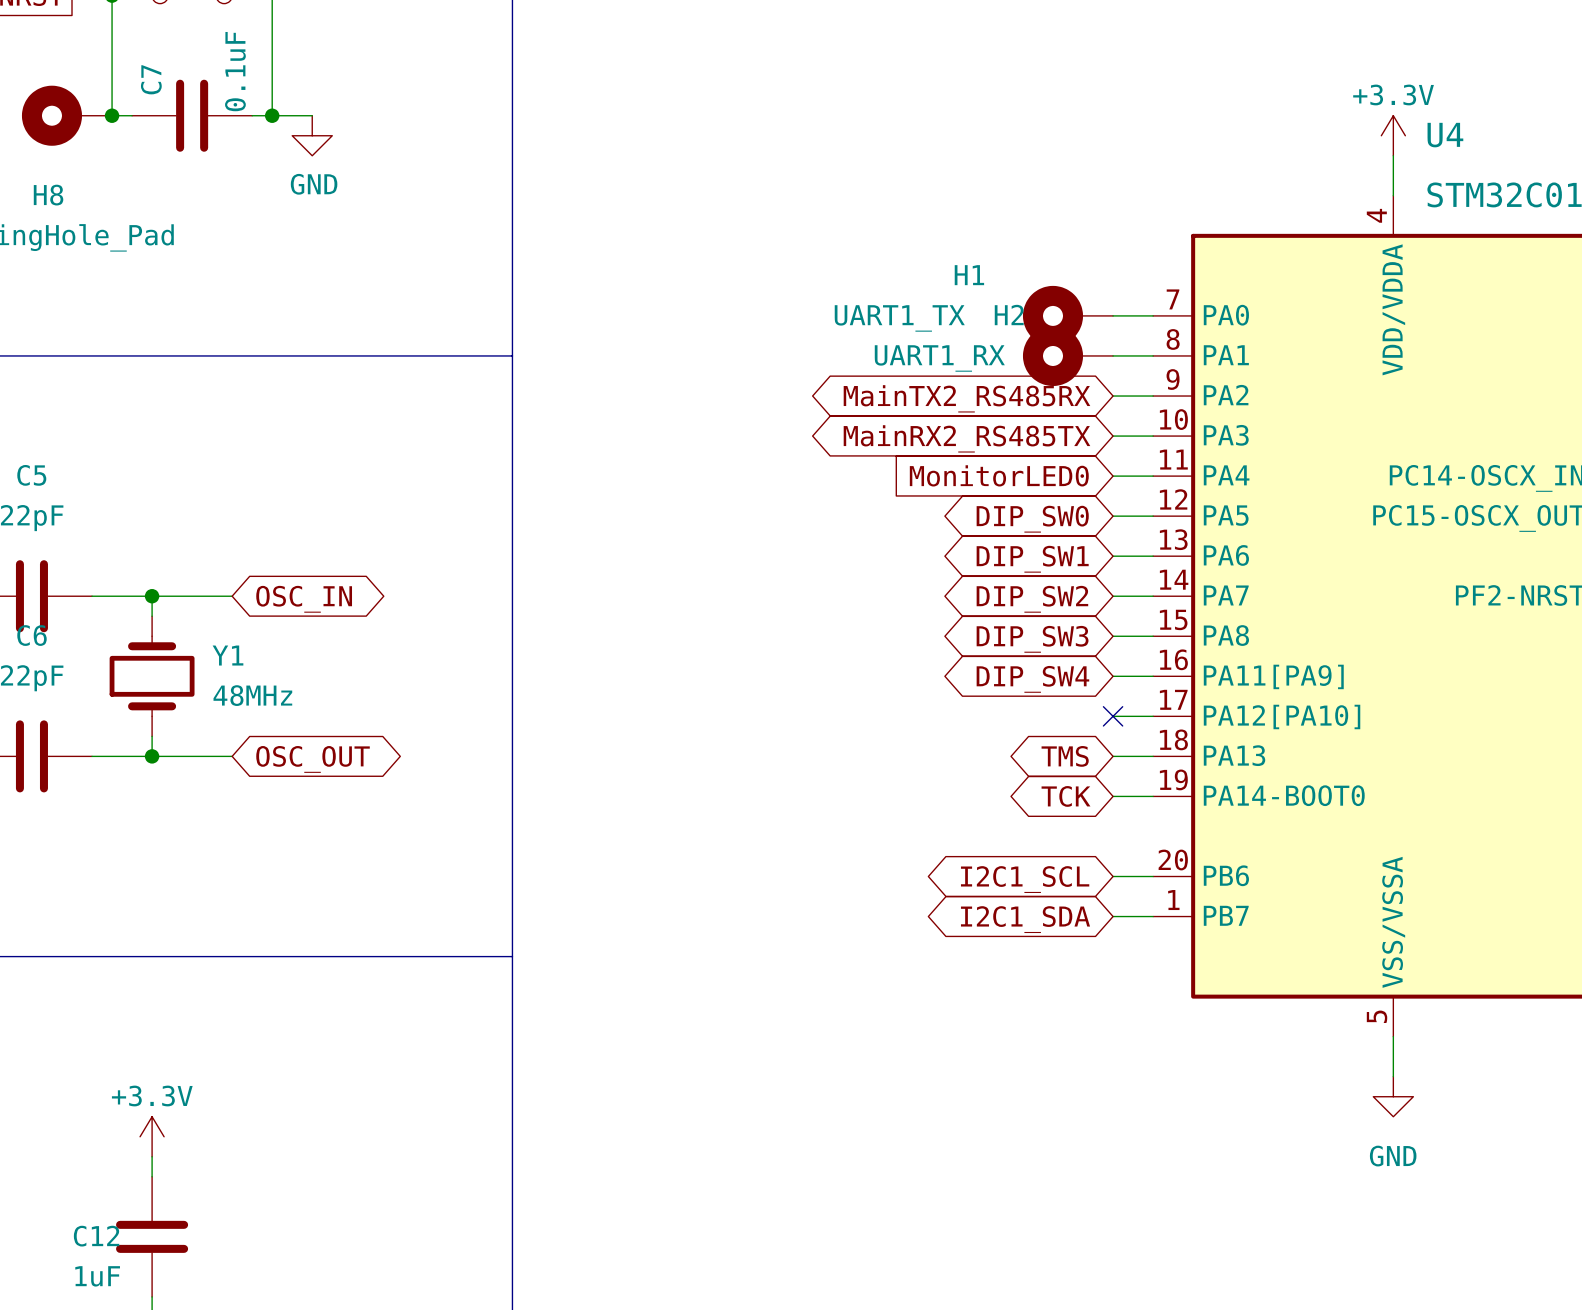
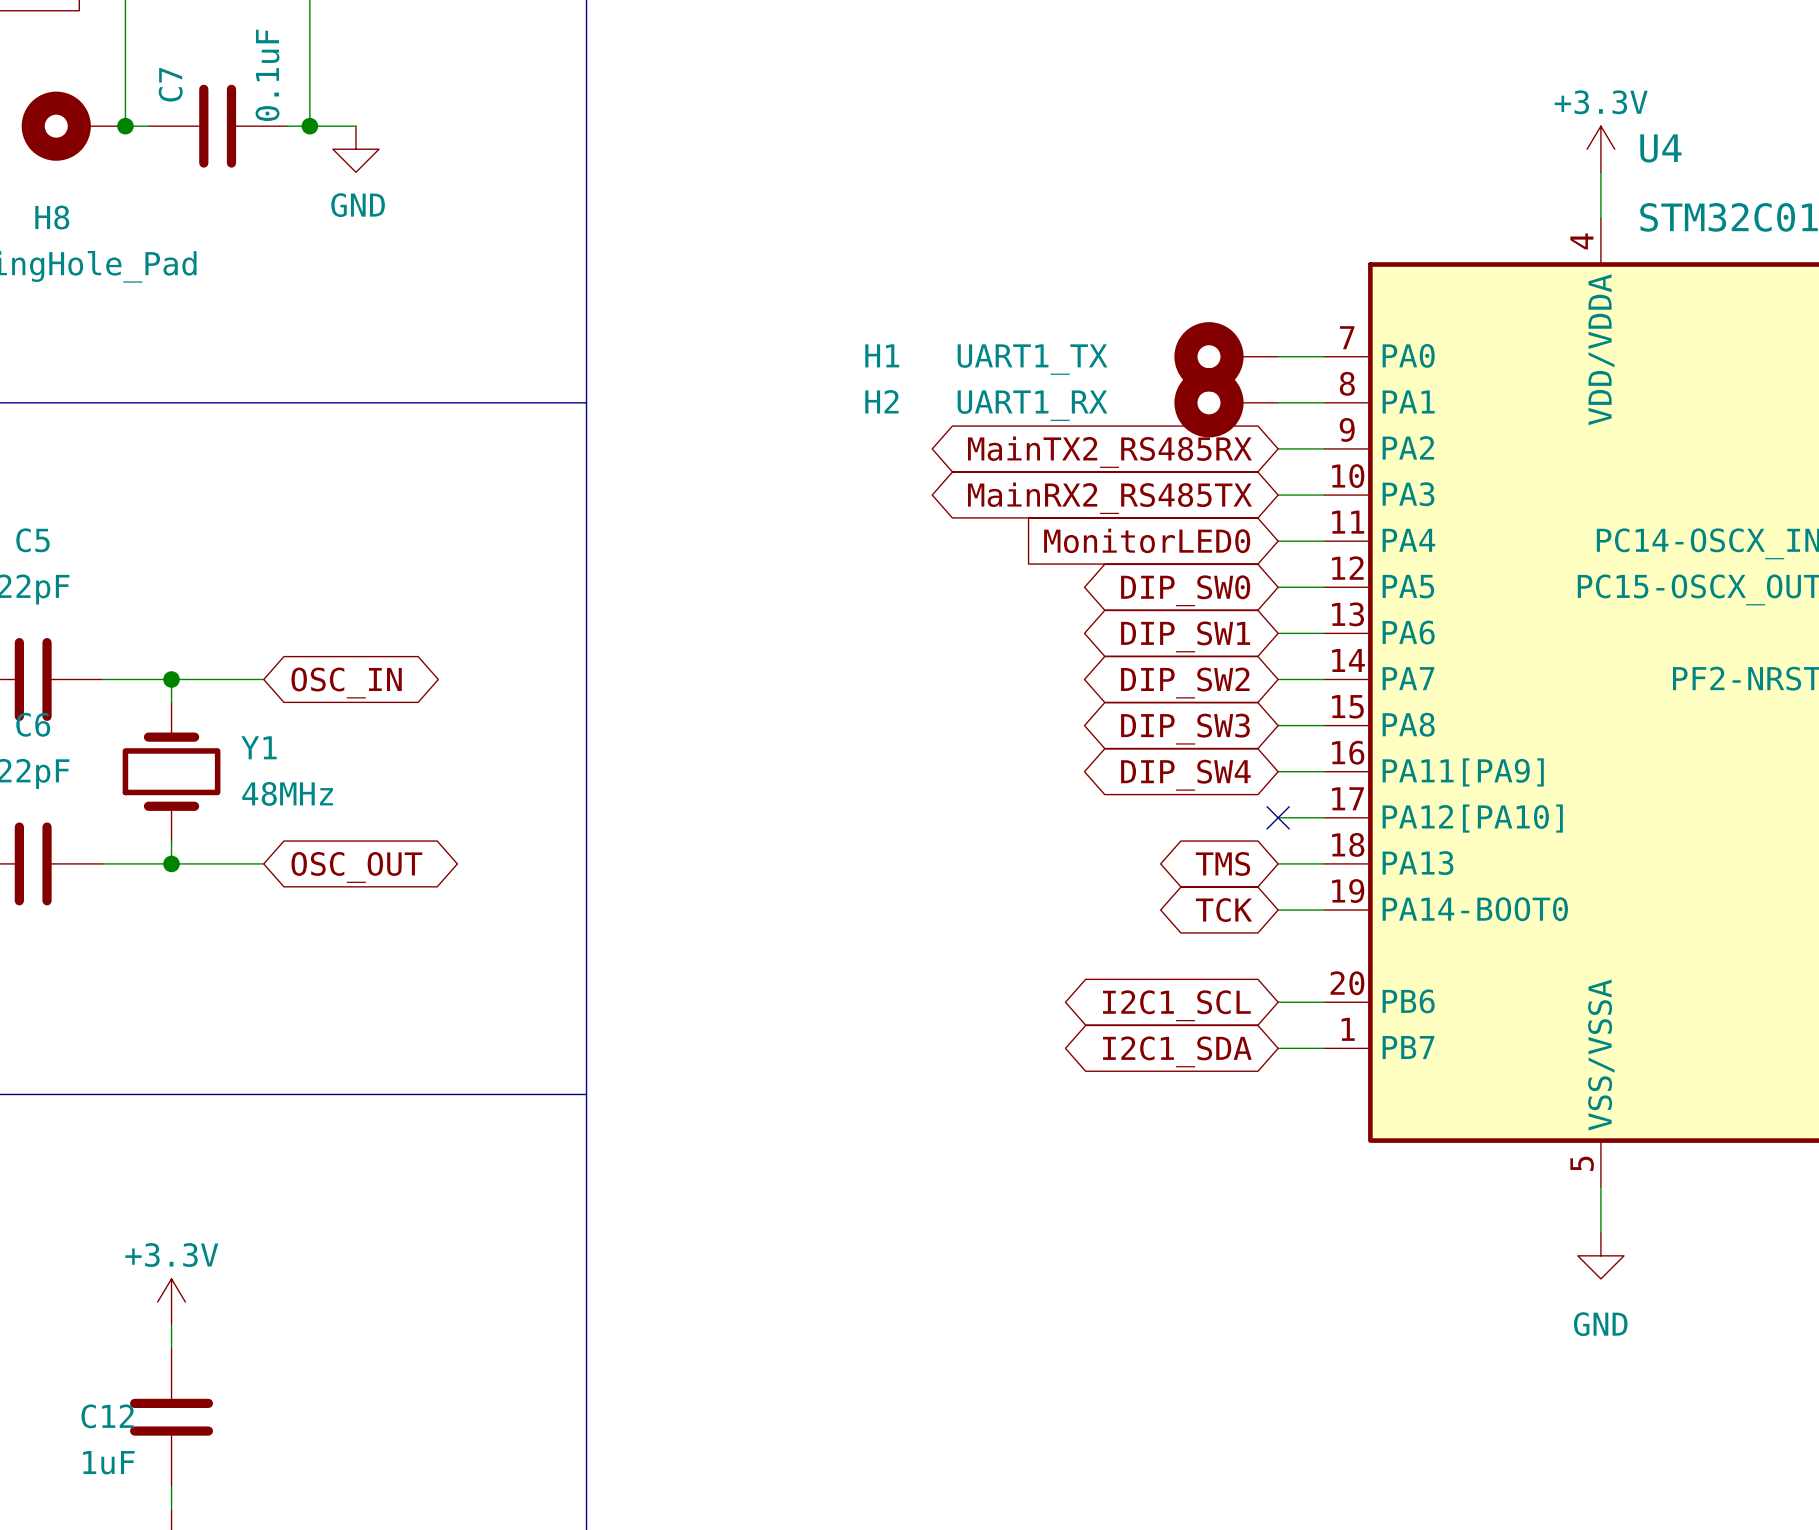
H1 name position: H1 (969, 275) -> H1 (882, 355)
H2 name position: H2 (1009, 315) -> H2 (881, 401)
H2 value position: UART1_RX (939, 358) -> UART1_RX (1032, 405)

